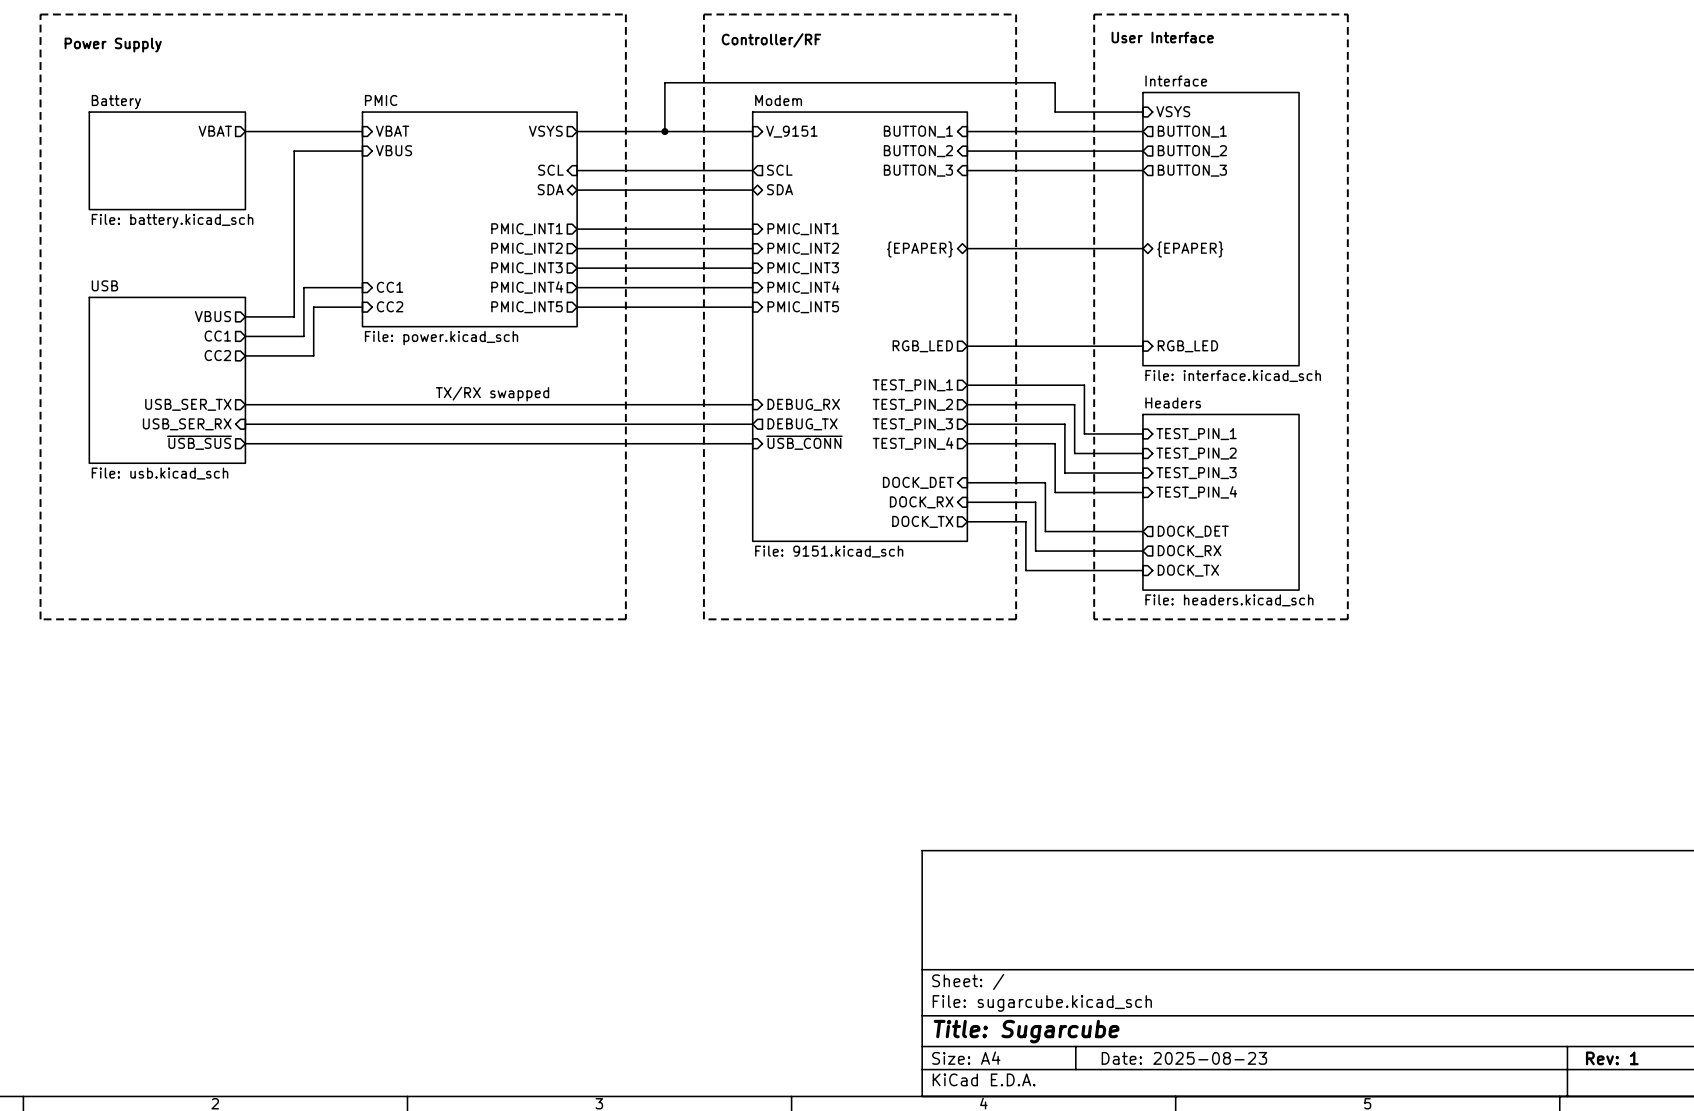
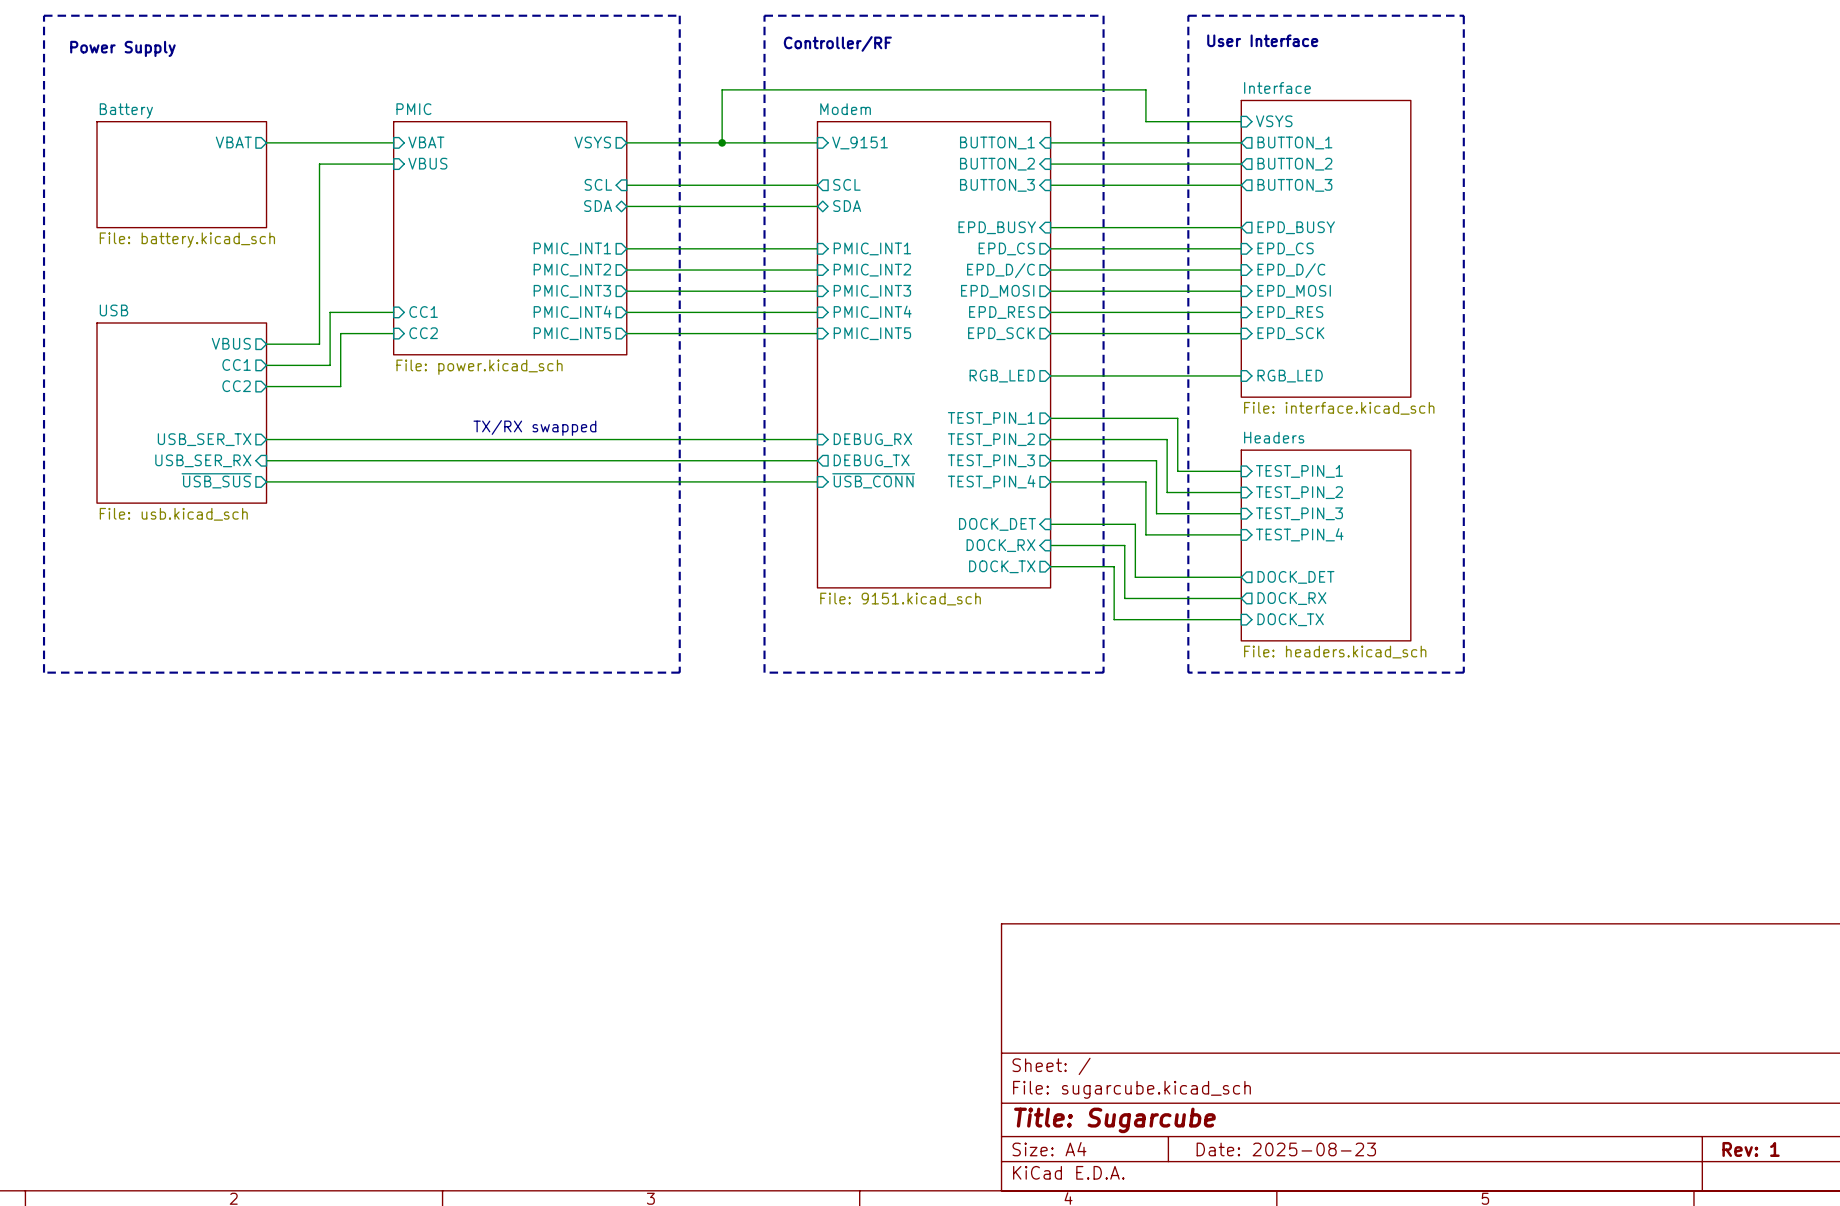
sheet pin: none -> EPD_BUSY (997, 227)
wire: none -> (1050, 227) (1241, 227)
sheet pin: none -> EPD_BUSY (1296, 227)
sheet pin: none -> EPD_CS (1006, 248)
wire: none -> (1050, 248) (1241, 248)
sheet pin: none -> EPD_CS (1285, 248)
bus: (967, 248) (1142, 248) -> none
sheet pin shape: bidirectional (920, 249) -> output (1000, 270)
sheet pin: {EPAPER} (920, 249) -> EPD_D/C (1000, 270)
sheet pin shape: bidirectional (1190, 249) -> input (1291, 270)
sheet pin: {EPAPER} (1190, 249) -> EPD_D/C (1291, 270)
sheet pin: none -> EPD_MOSI (997, 291)
wire: none -> (1050, 291) (1241, 291)
sheet pin: none -> EPD_MOSI (1294, 291)
sheet pin: none -> EPD_RES (1001, 312)
wire: none -> (1050, 312) (1241, 312)
sheet pin: none -> EPD_RES (1290, 312)
sheet pin: none -> EPD_SCK (1001, 333)
wire: none -> (1050, 333) (1241, 333)
sheet pin: none -> EPD_SCK (1290, 333)

